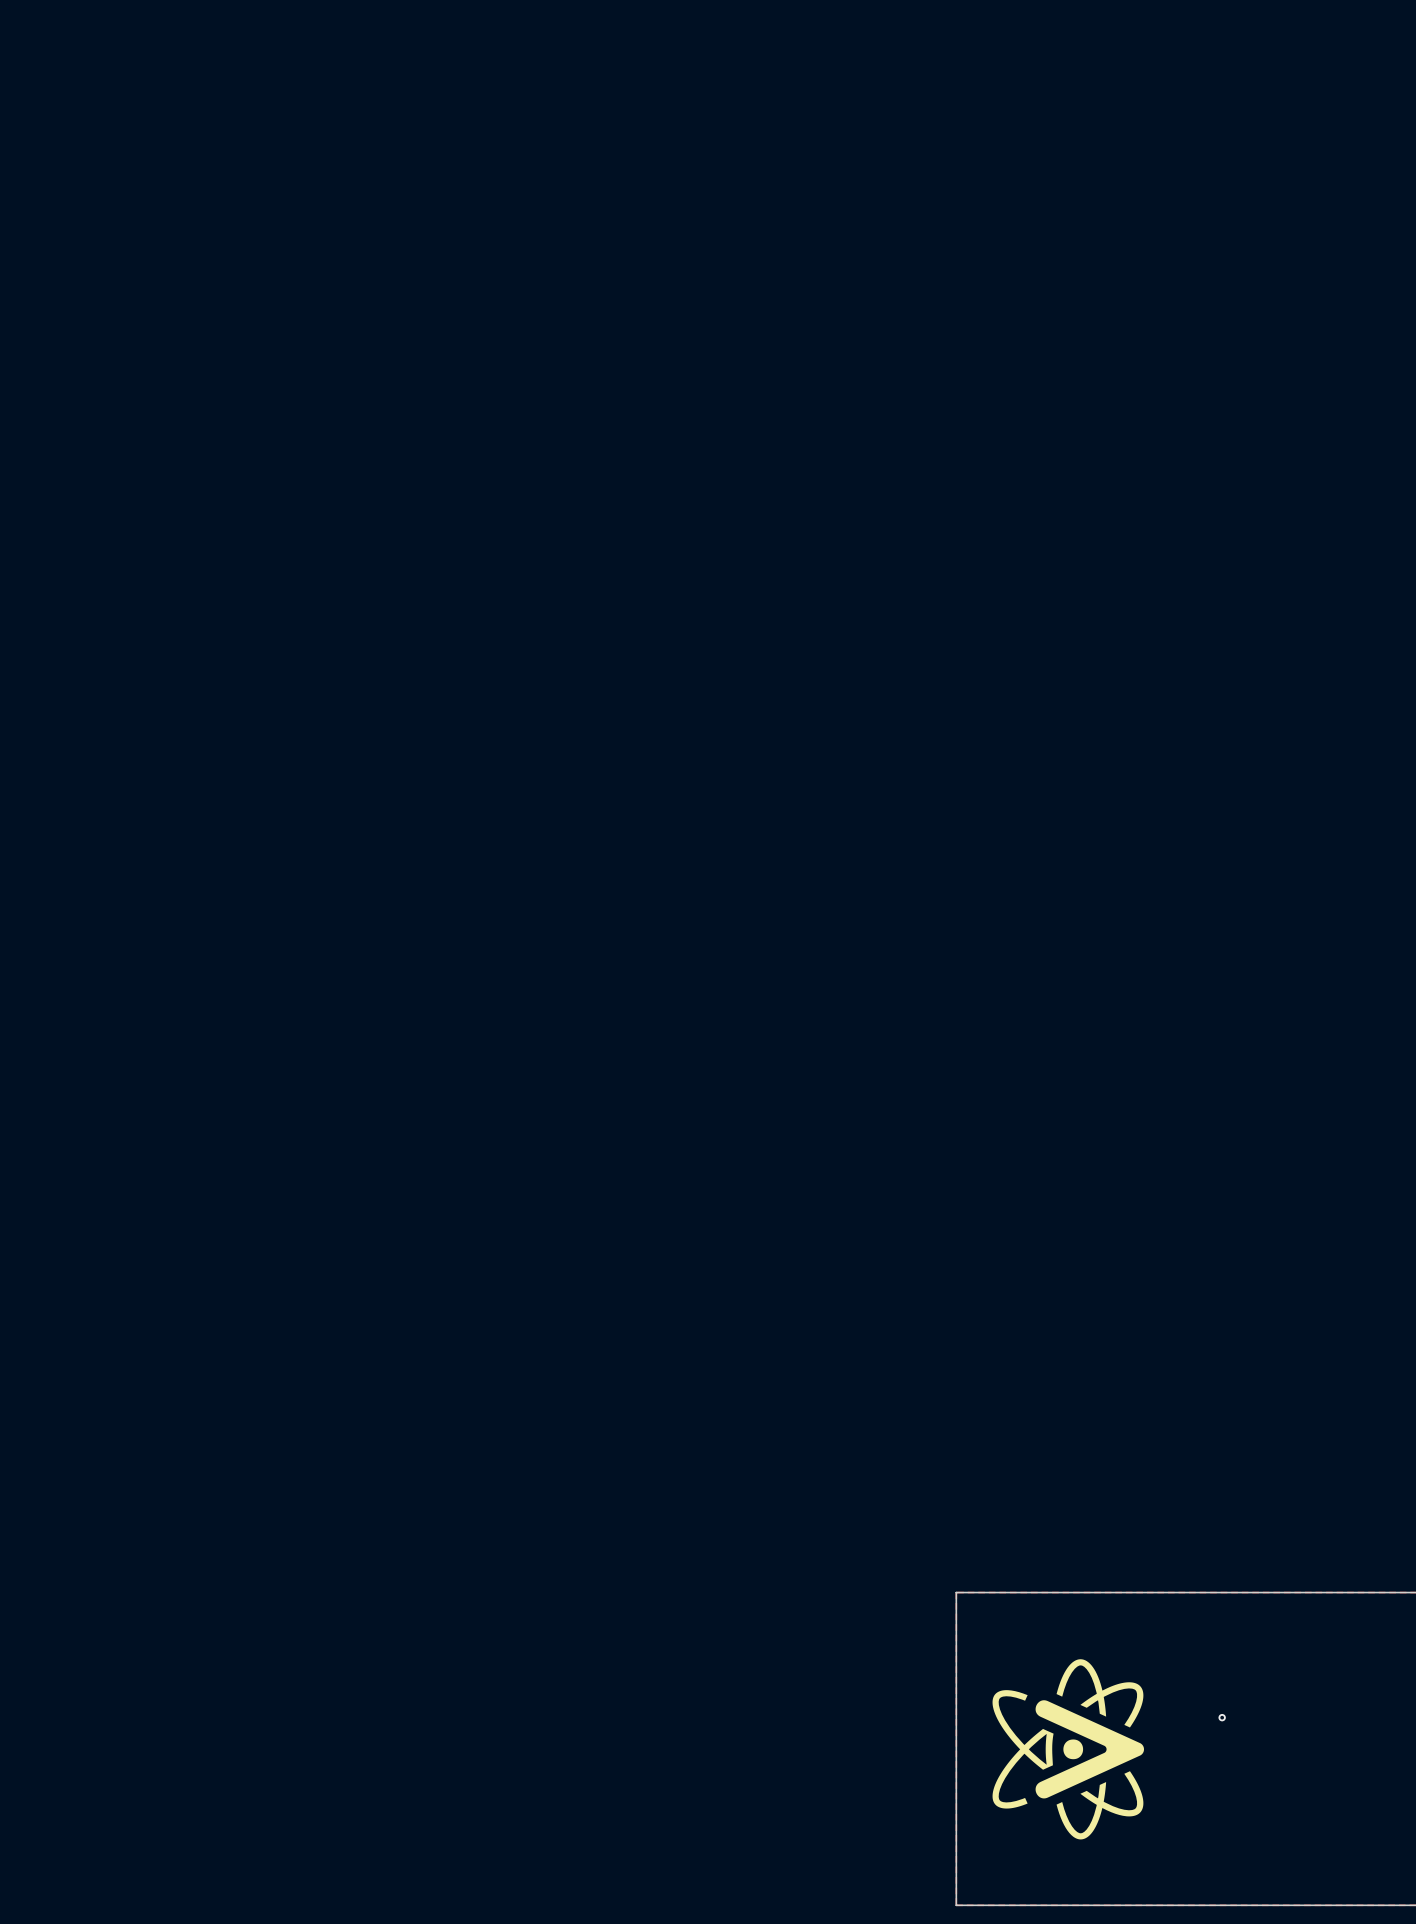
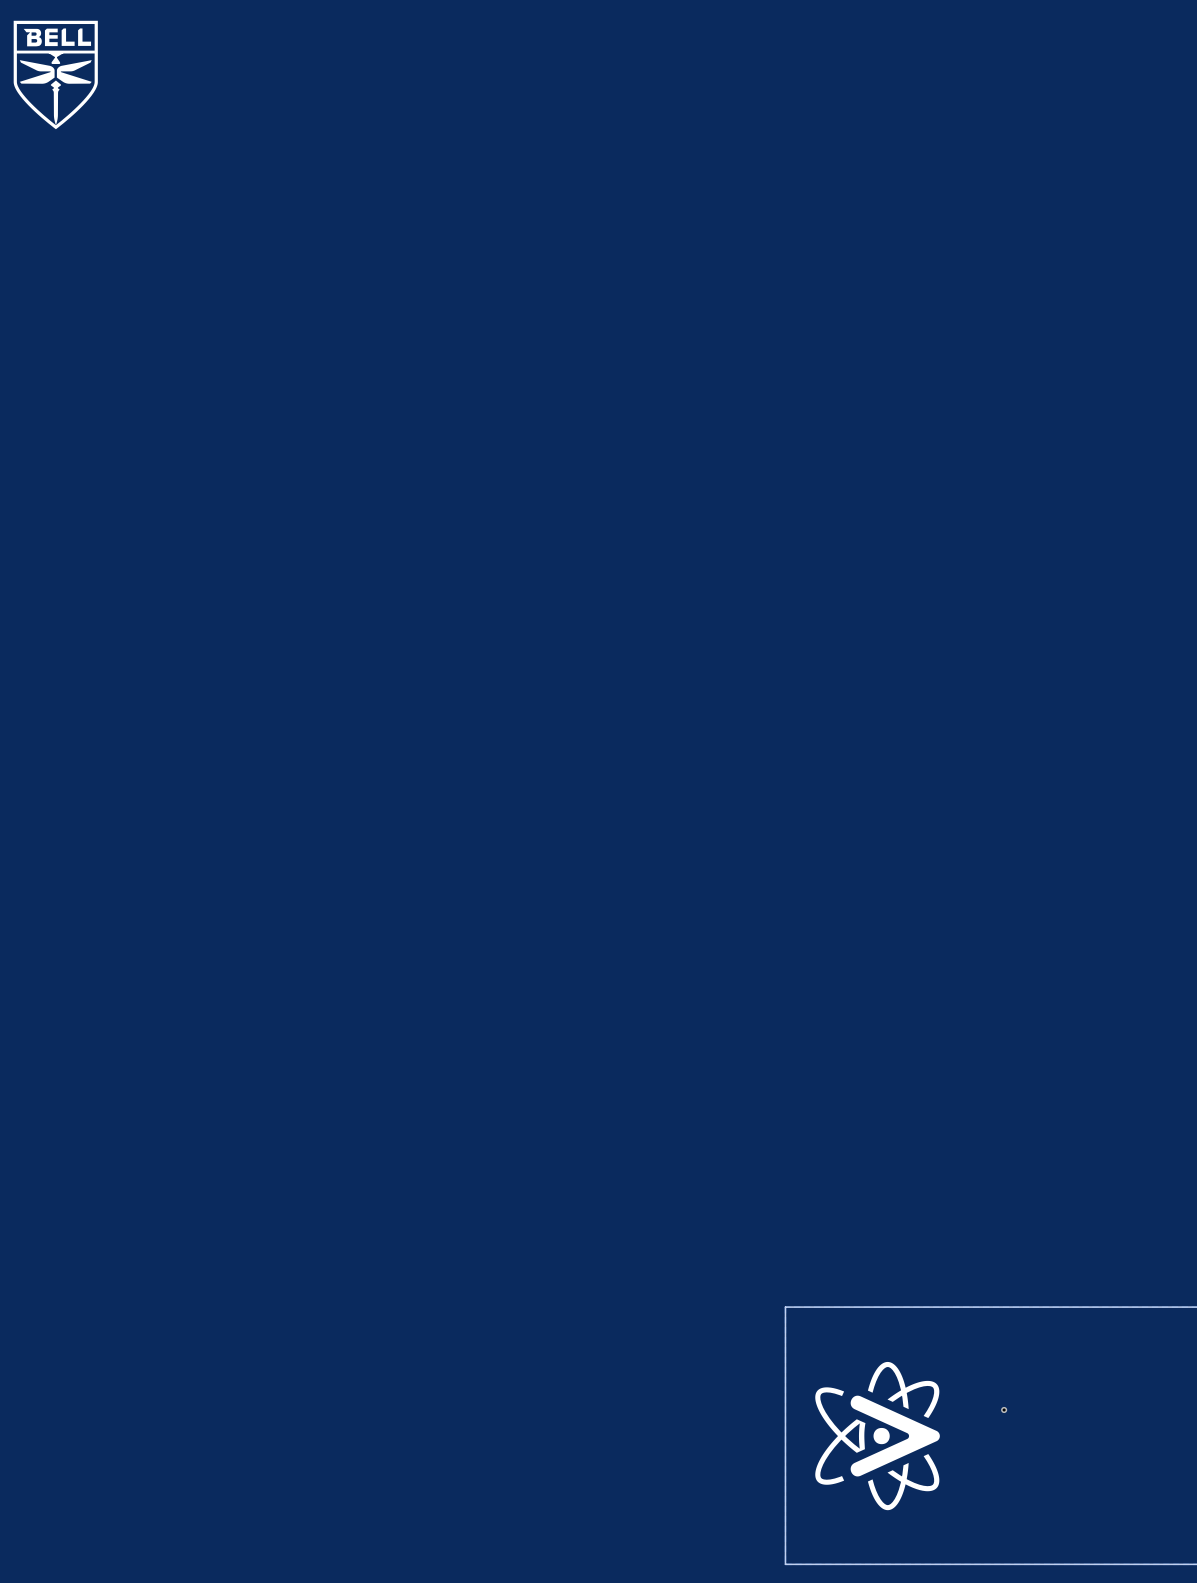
drawing: none -> [13, 20, 98, 130]

